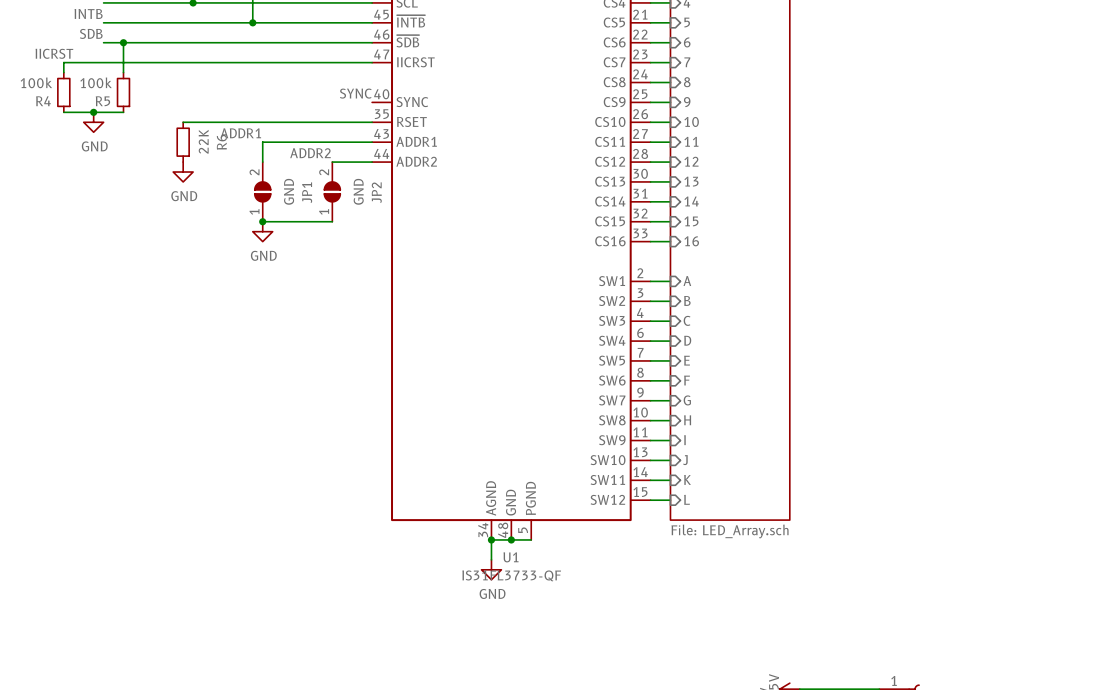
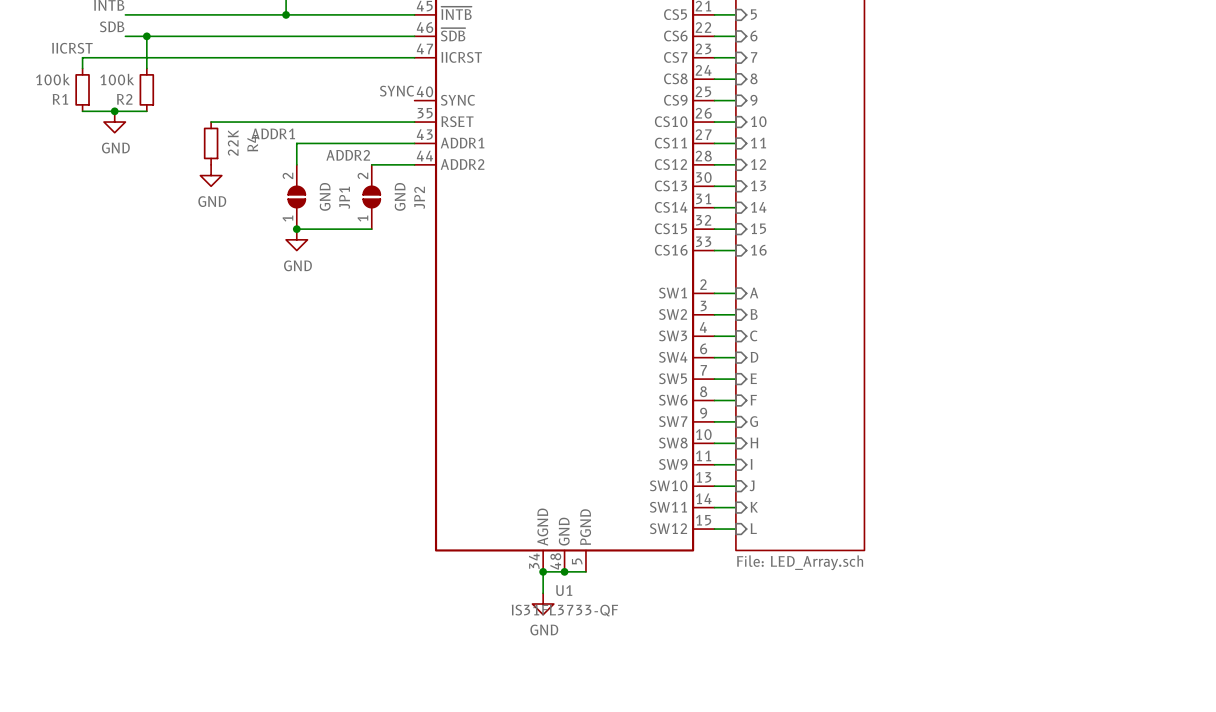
R4 name: R4 (43, 101) -> R1 (60, 99)
R5 name: R5 (102, 101) -> R2 (124, 99)
R6 name: R6 (221, 142) -> R4 (252, 143)

